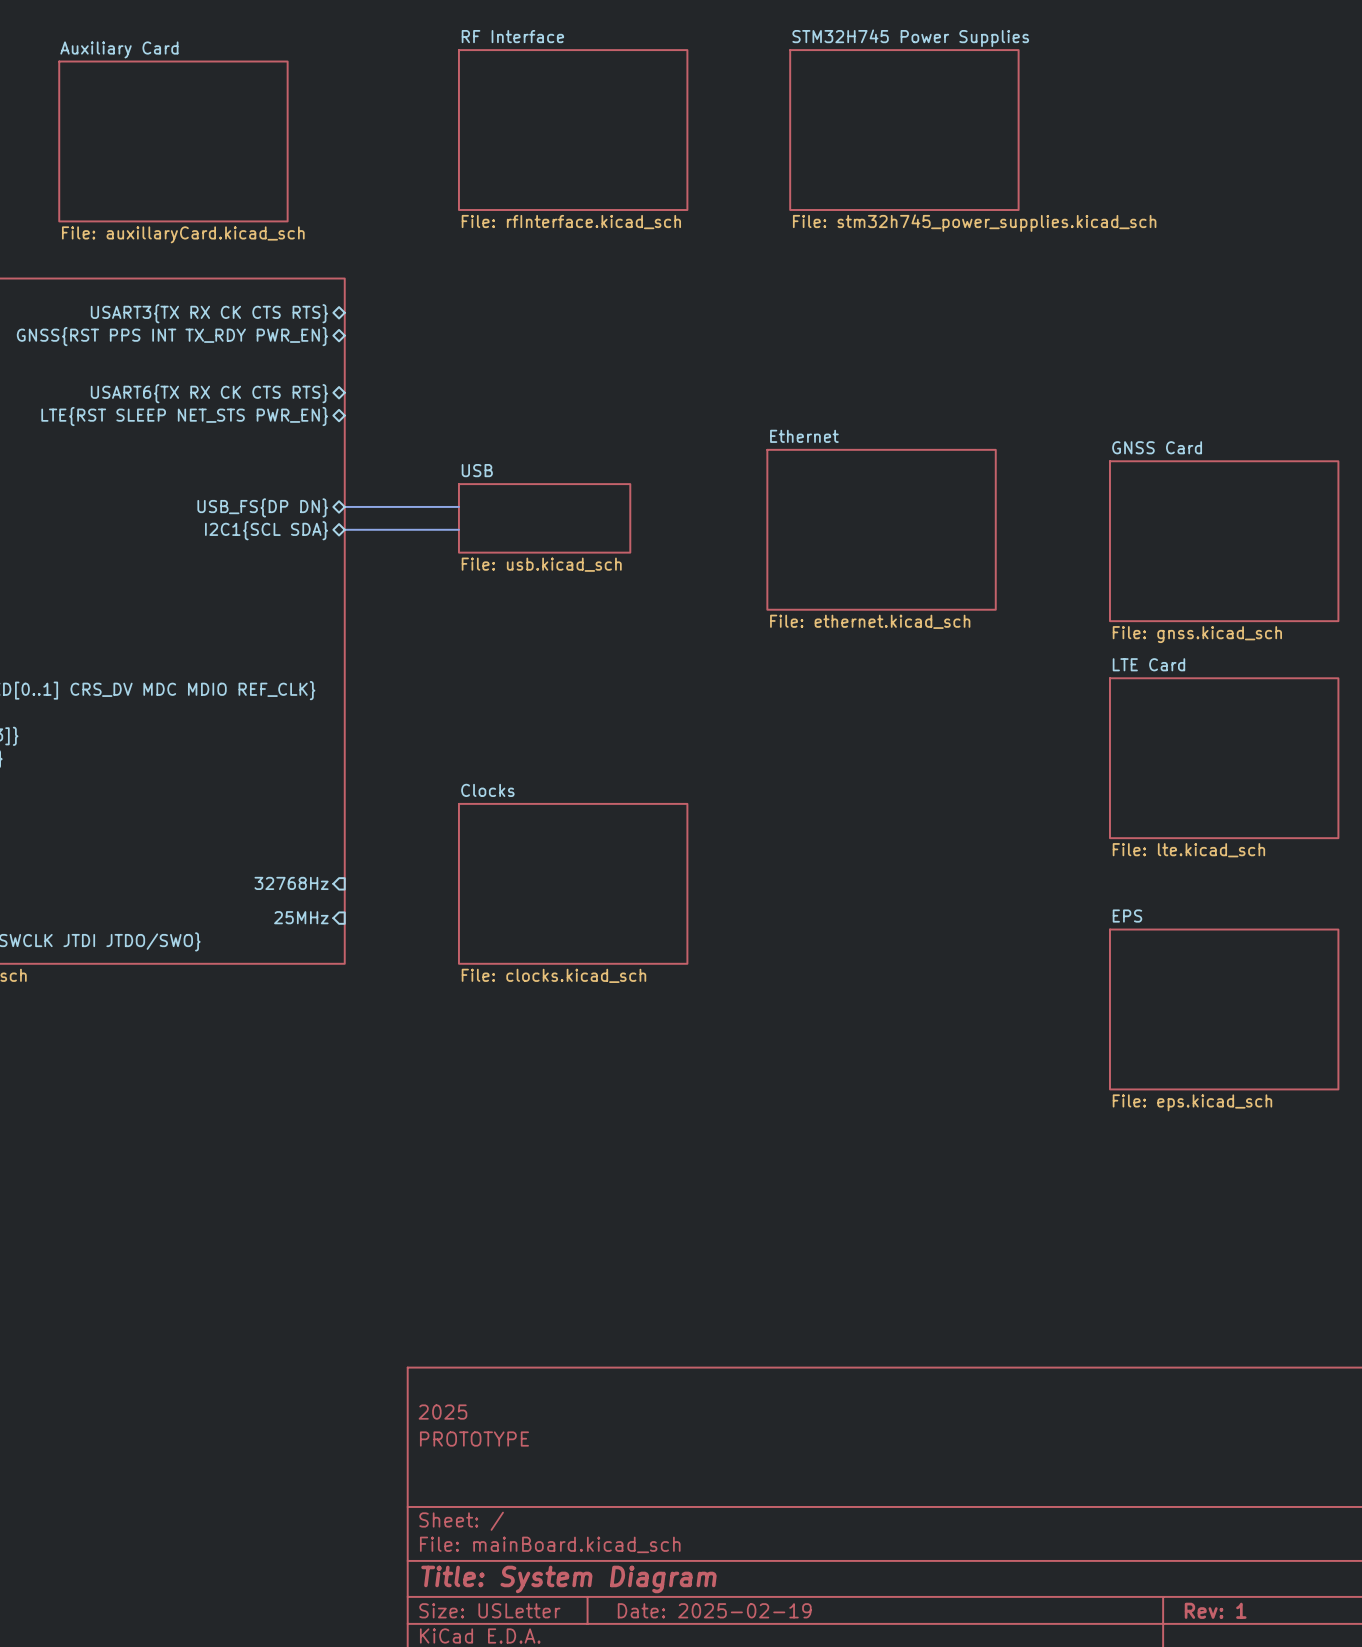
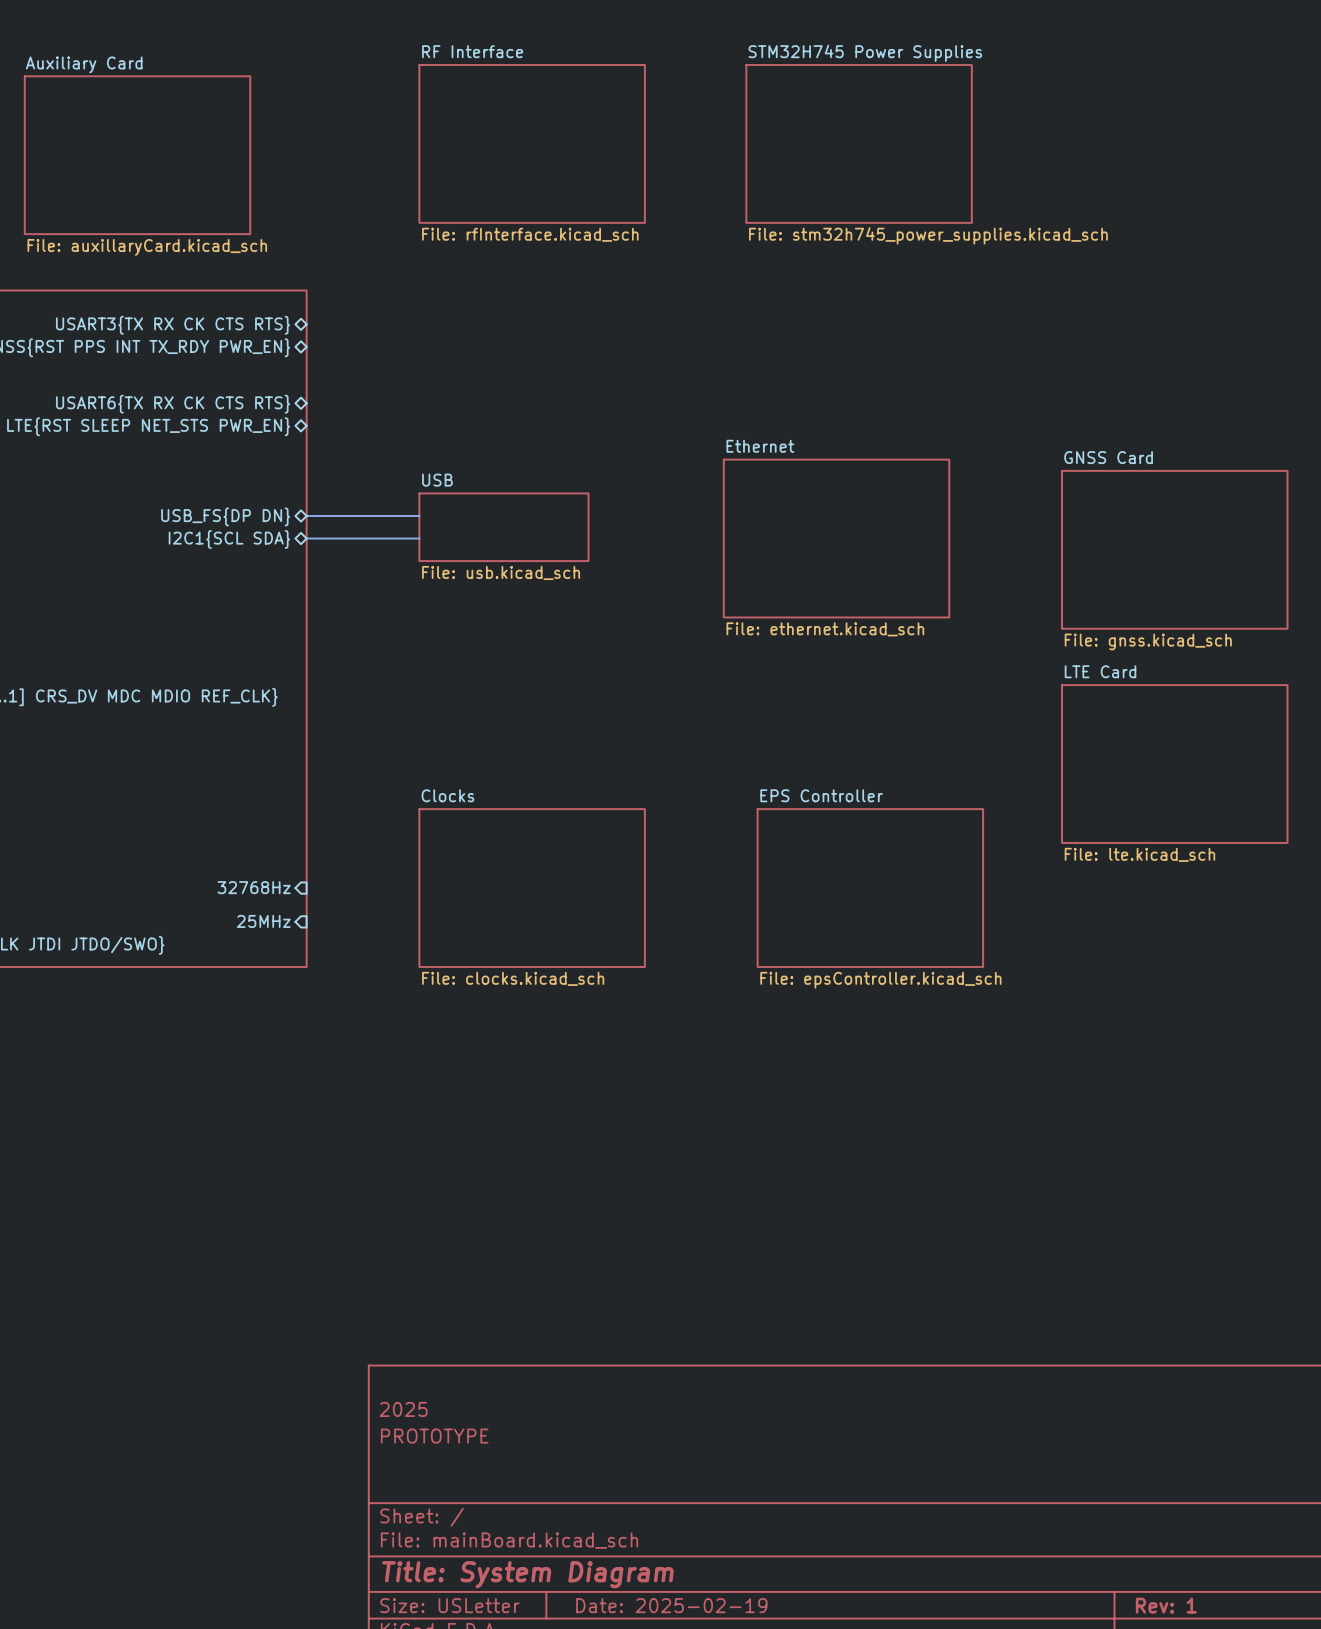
sheet EPS Controller: none -> File: epsController.kicad_sch (870, 888)
sheet EPS: File: eps.kicad_sch (1224, 1009) -> none

